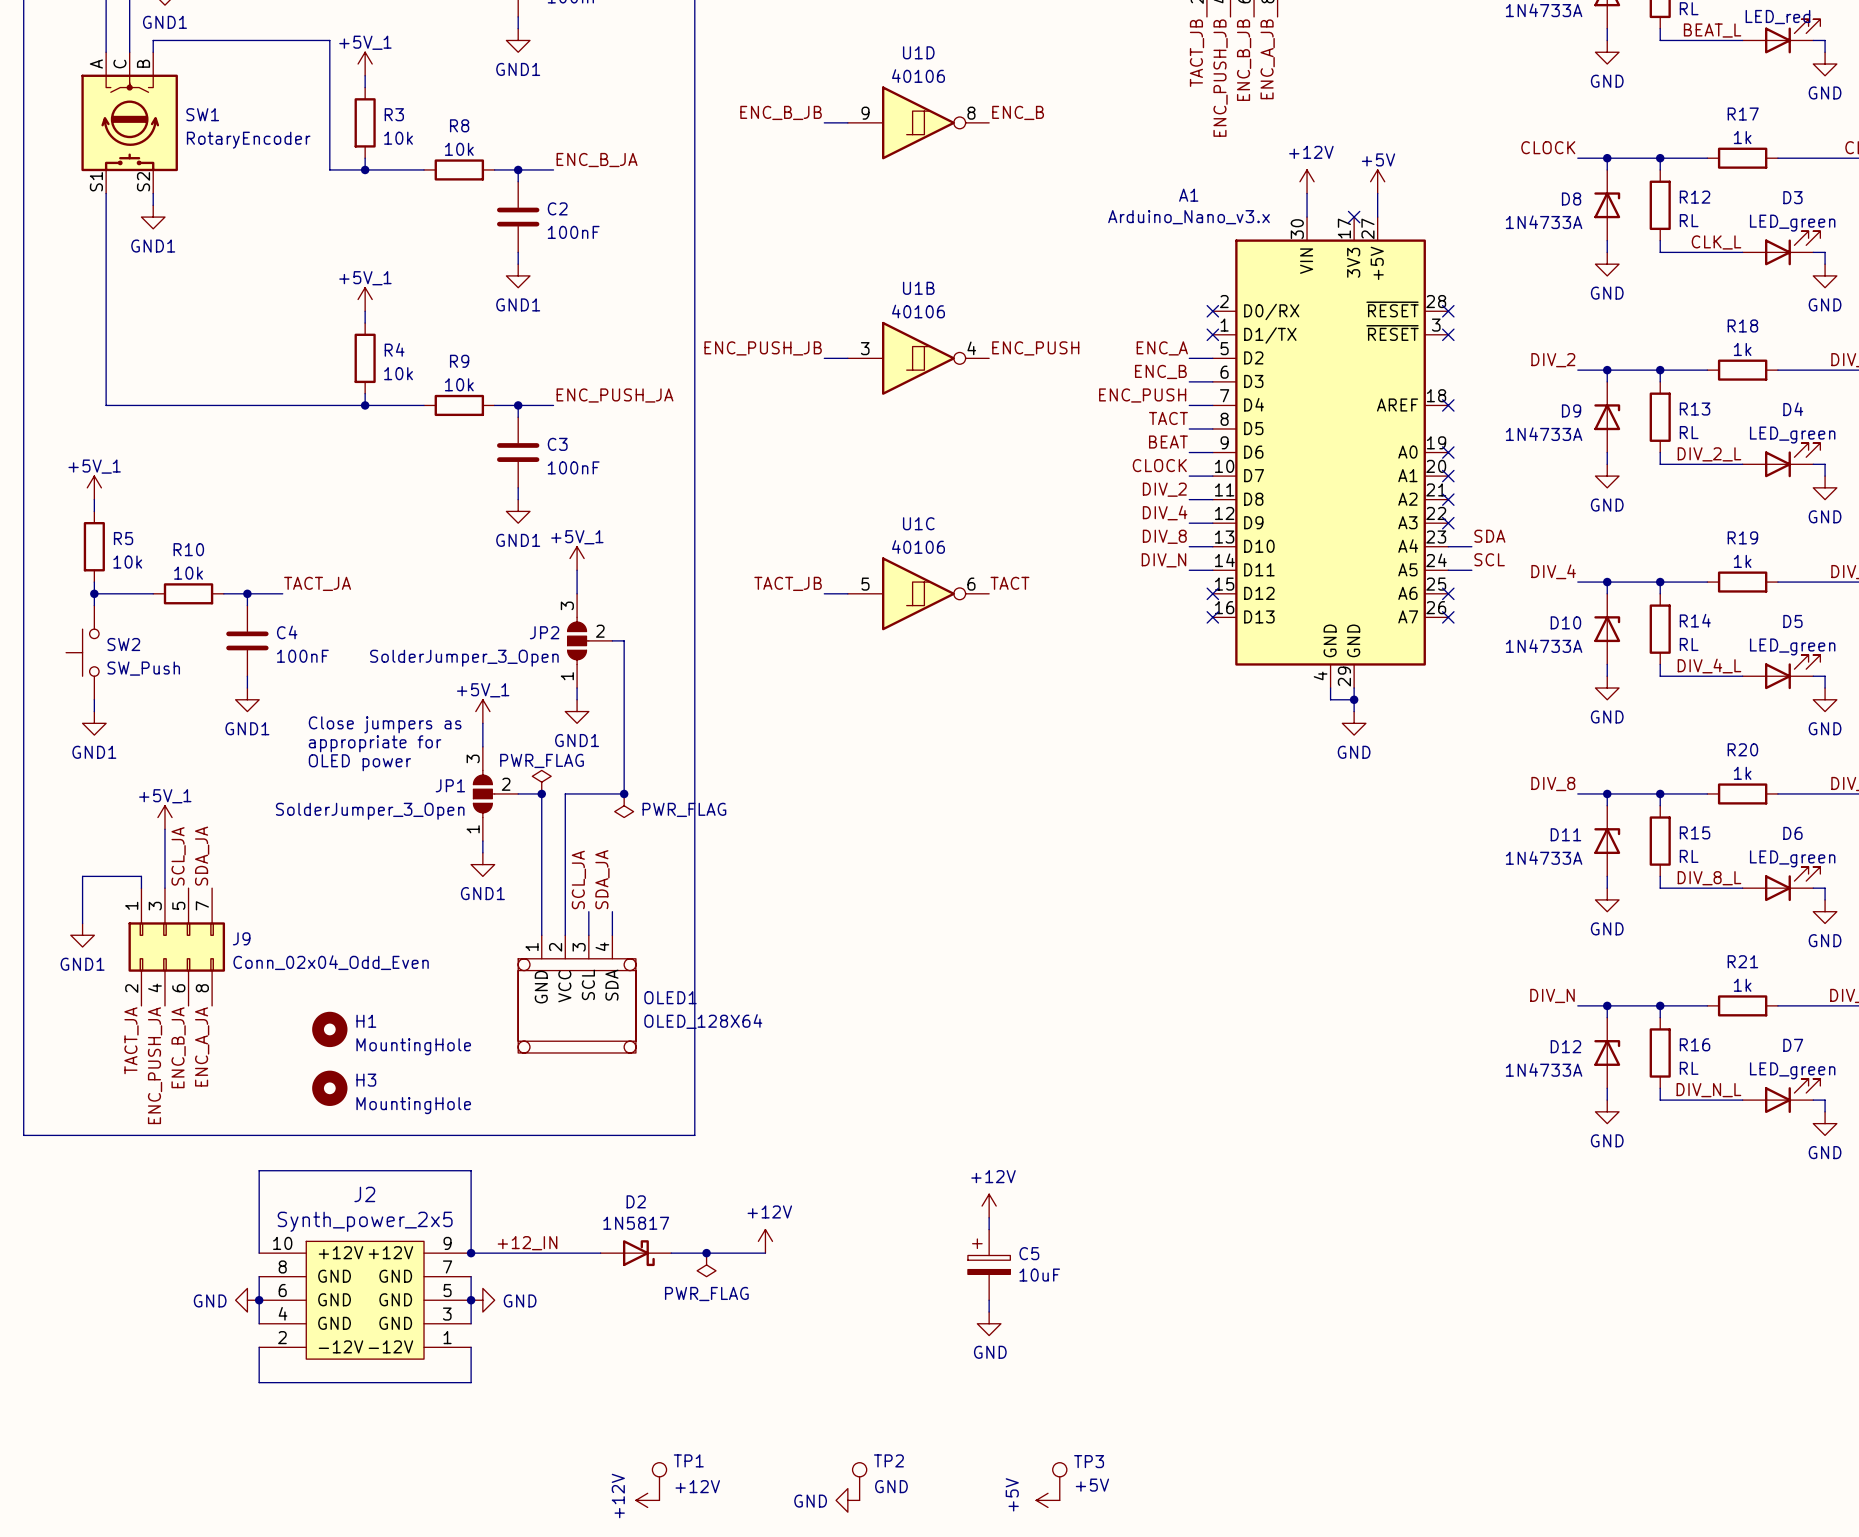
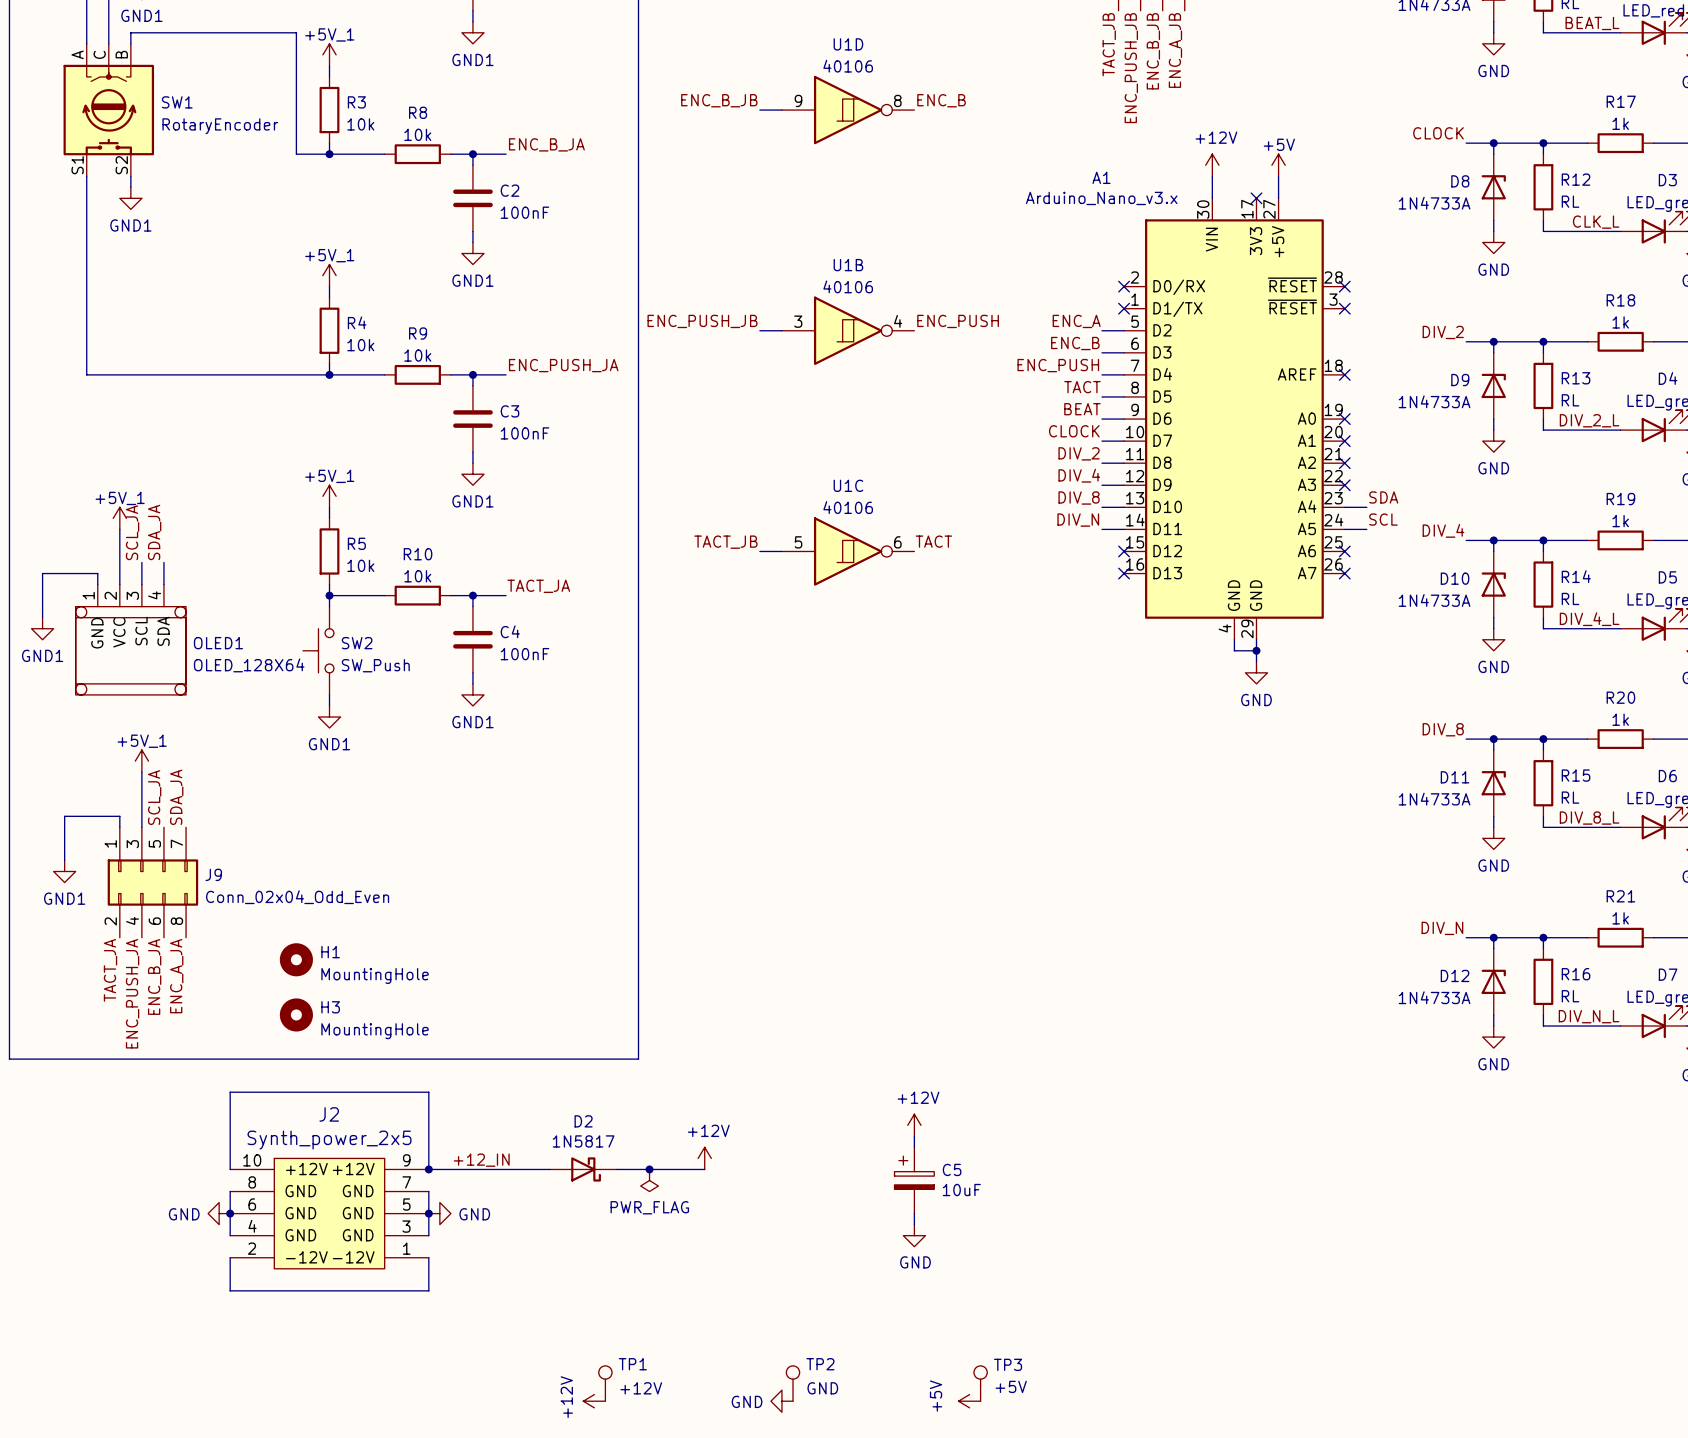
power symbol position: +5V_1 (94, 487) -> +5V_1 (119, 518)
wire: (94, 499) (94, 511) -> none
power symbol: none -> +5V_1 (329, 496)
R5 position: (94, 546) -> (329, 551)
power symbol: +5V_1 (577, 558) -> none
wire: none -> (119, 529) (119, 584)
wire: (577, 570) (577, 593) -> none
label: none -> SCL_JA (132, 532)
label: none -> SDA_JA (154, 532)
wire: (94, 582) (94, 605) -> (141, 562) (141, 584)
label: TACT_JA (317, 583) -> none
wire: (94, 593) (153, 593) -> none
junction: (94, 593) -> none
R10 position: (188, 593) -> (417, 595)
wire: (223, 593) (282, 593) -> (329, 595) (384, 595)
wire: (247, 593) (247, 605) -> (329, 507) (329, 518)
junction: (247, 593) -> none
wire: none -> (163, 562) (163, 584)
wire: none -> (97, 584) (97, 573) (42, 573) (42, 617)
label: none -> TACT_JA (538, 586)
C4 position: (247, 640) -> (472, 639)
junction: none -> (329, 595)
wire: none -> (450, 595) (506, 595)
wire: none -> (472, 595) (472, 606)
junction: none -> (472, 595)
JP2: SolderJumper_3_Open (590, 640) -> none
wire: (612, 640) (624, 640) (624, 793) (565, 793) (565, 935) -> none
SW2 position: (82, 652) -> (318, 650)
wire: (247, 676) (247, 688) -> none
wire: (577, 688) (577, 699) -> (472, 672) (472, 683)
power symbol: GND1 (247, 699) -> none
power symbol: +5V_1 (482, 711) -> none
power symbol: GND1 (577, 711) -> none
power symbol position: GND1 (94, 723) -> GND1 (42, 628)
wire: (482, 723) (482, 746) -> (329, 584) (329, 606)
text: Close jumpers as (385, 724) -> none
text: appropriate for (375, 743) -> none
power symbol: none -> GND1 (472, 694)
text: OLED power (359, 762) -> none
power symbol: none -> GND1 (329, 717)
power symbol: PWR_FLAG (541, 782) -> none
JP1: SolderJumper_3_Open (495, 793) -> none
wire: (518, 793) (541, 793) (541, 935) -> none
junction: (541, 793) -> none
junction: (624, 793) -> none
power symbol: PWR_FLAG (624, 805) -> none
wire: (482, 841) (482, 852) -> (329, 694) (329, 705)
power symbol: GND1 (482, 864) -> none
label: SCL_JA (578, 879) -> none
label: SDA_JA (602, 879) -> none
wire: (588, 911) (588, 935) -> none
wire: (612, 911) (612, 935) -> none
OLED1 position: (577, 994) -> (130, 639)

